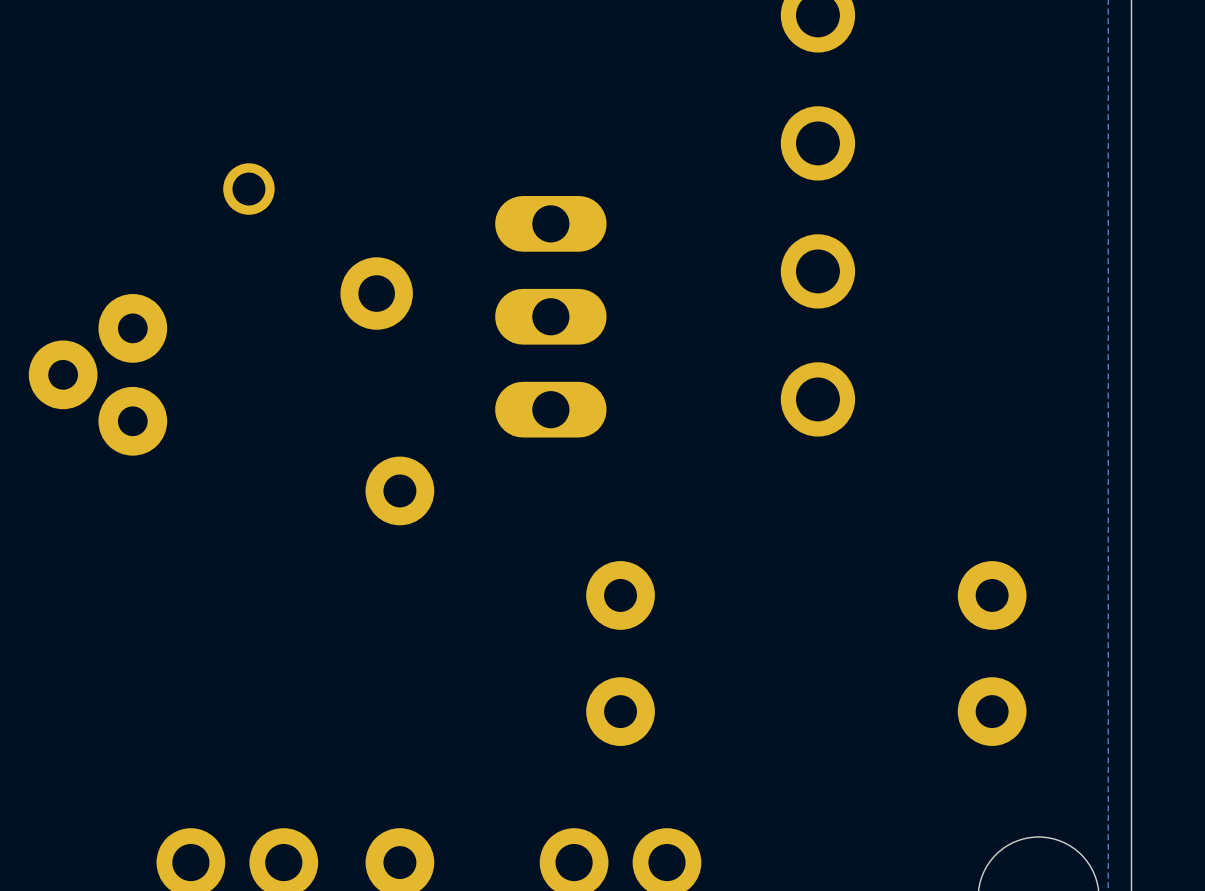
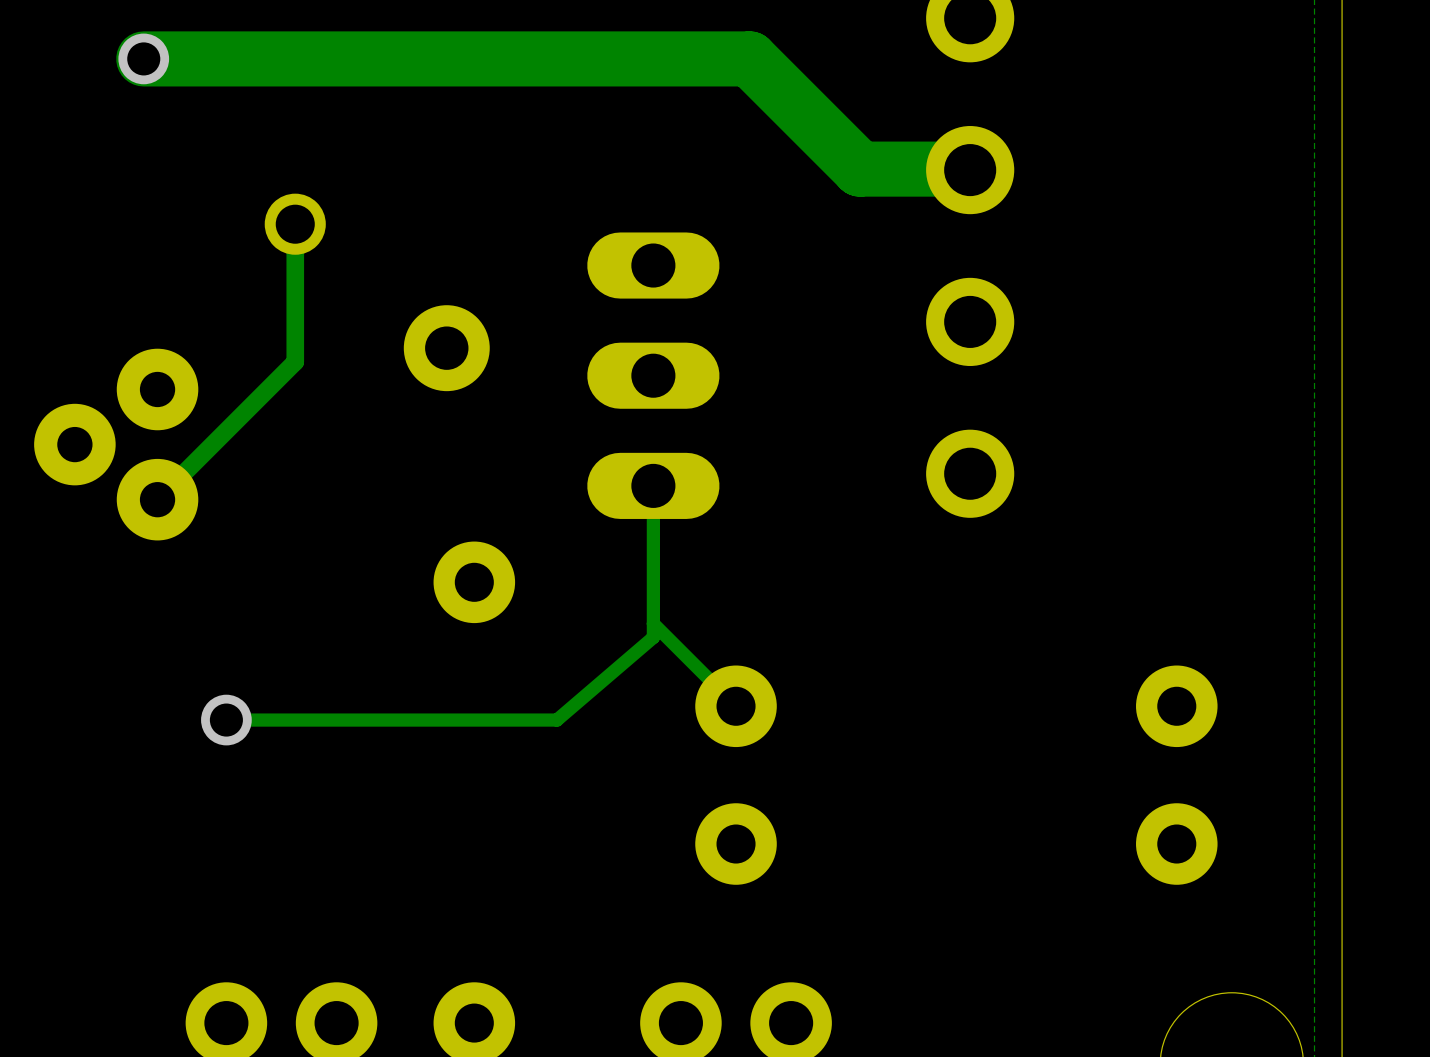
track: none -> (143, 58) (749, 58) (859, 169) (970, 170)
via: none -> (143, 58)
track: none -> (295, 224) (295, 361) (157, 499)
track: none -> (653, 485) (653, 637) (556, 720) (226, 720)
track: none -> (653, 623) (736, 706)
via: none -> (226, 720)

